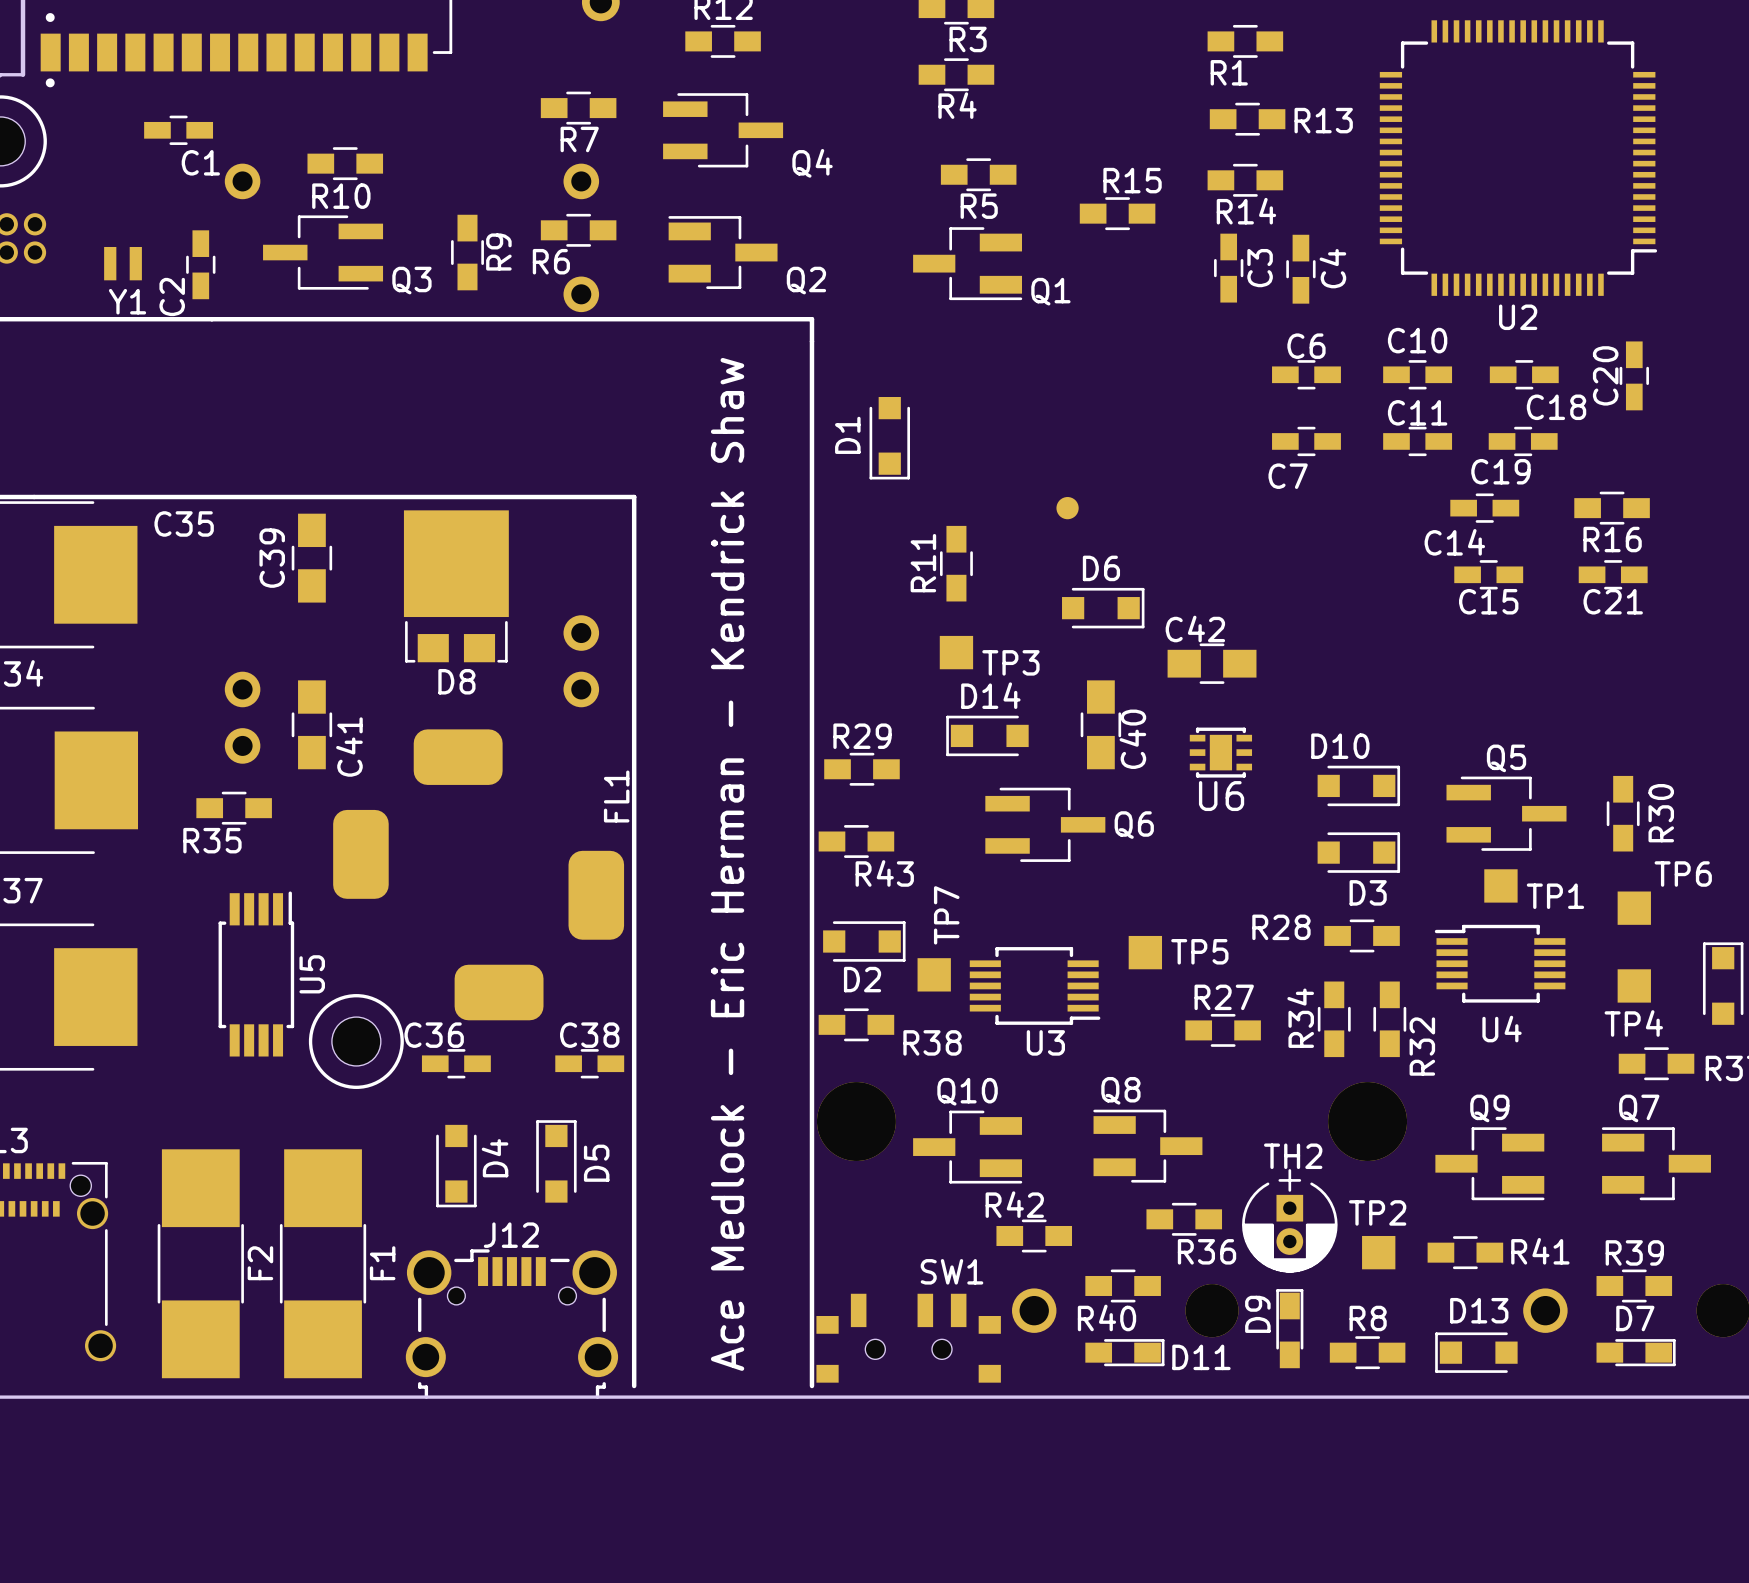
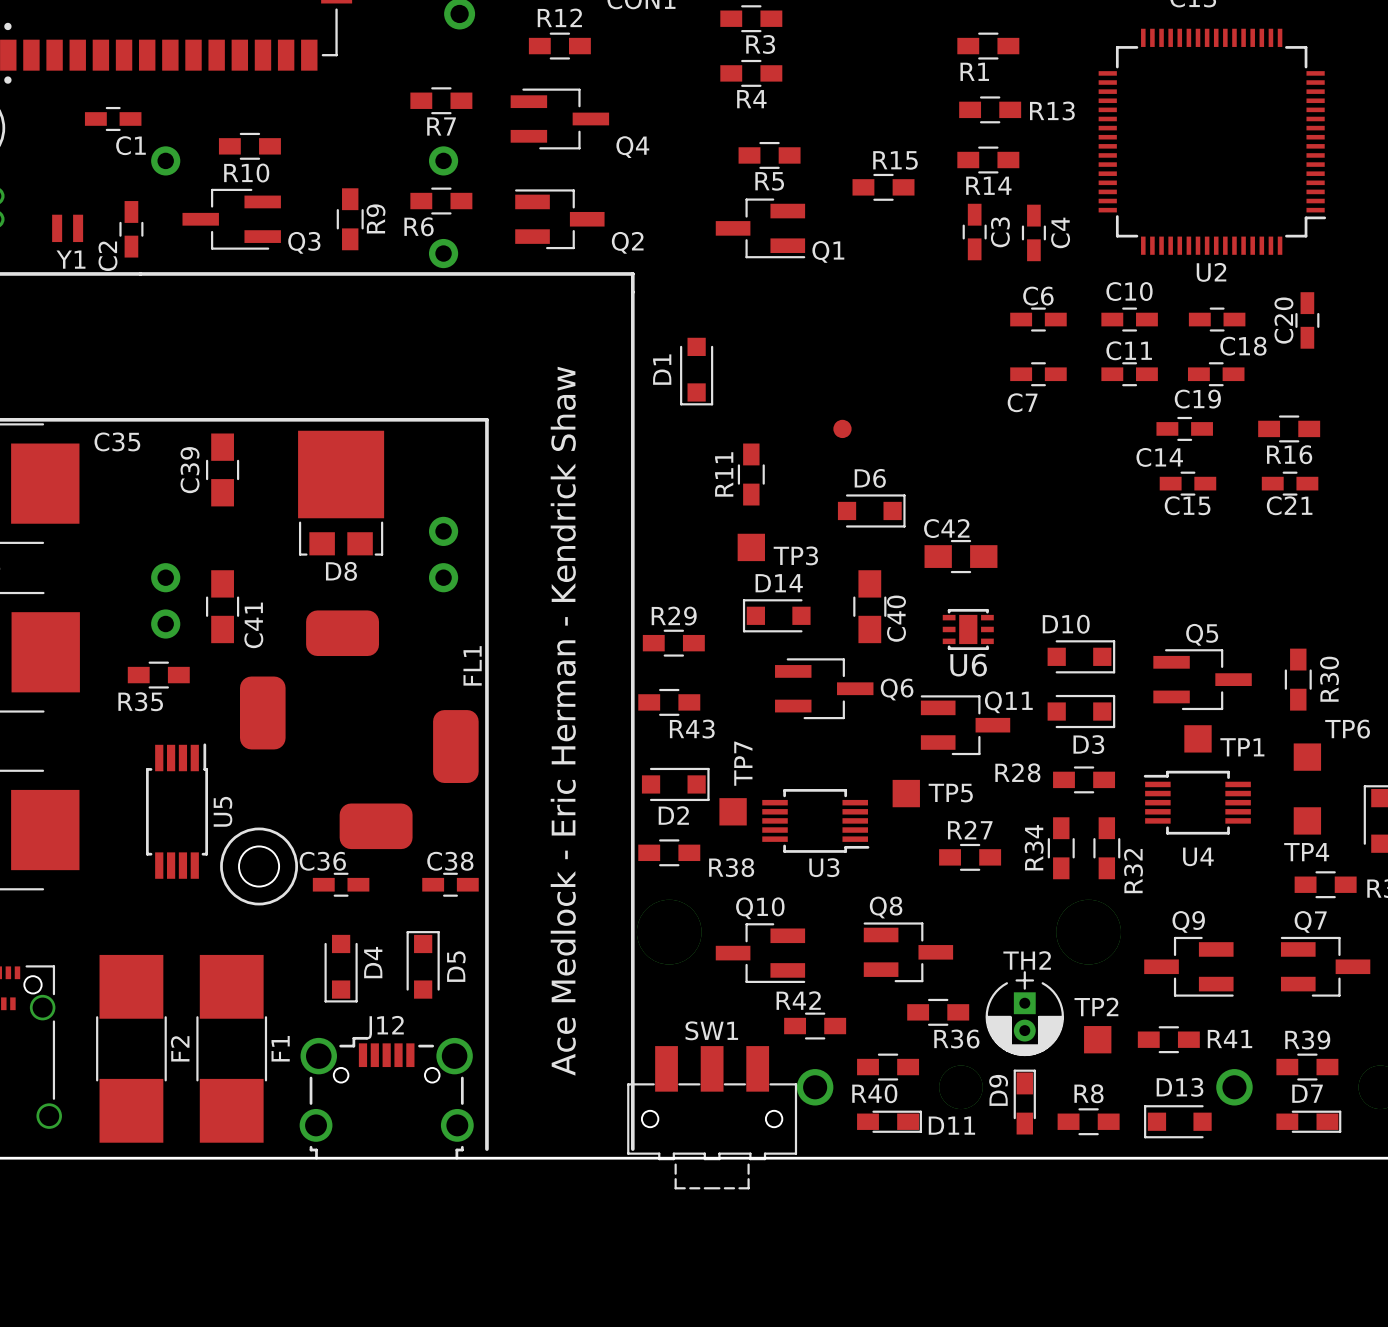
Q11: none -> (965, 725)
SW1 name position: SW1 (952, 1271) -> SW1 (711, 1030)
SW1 footprint: [816, 1293, 1001, 1383] -> [627, 1046, 798, 1190]

